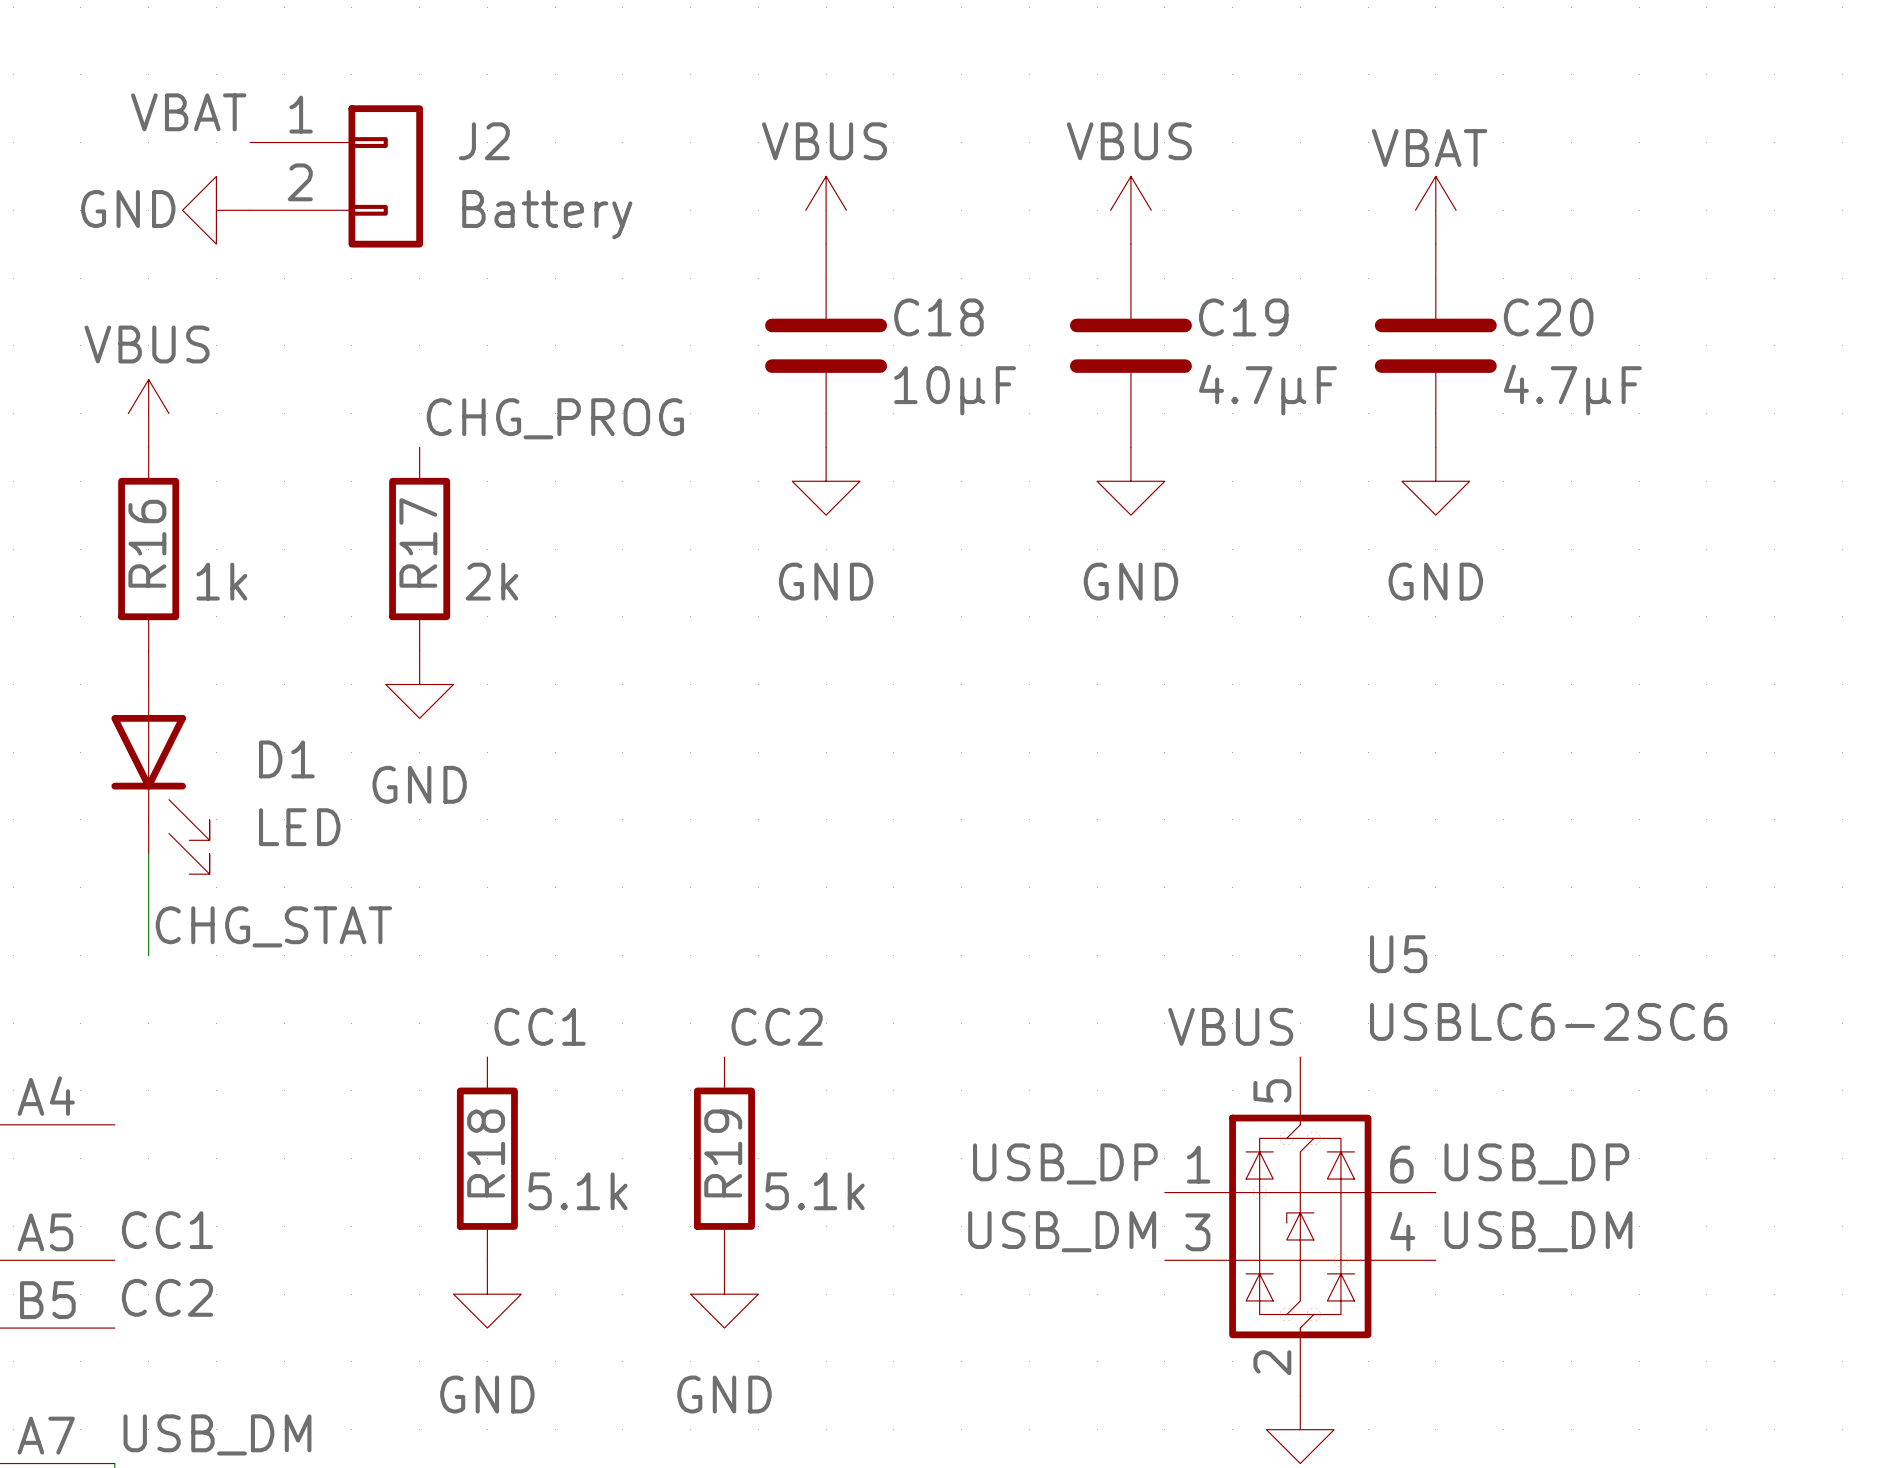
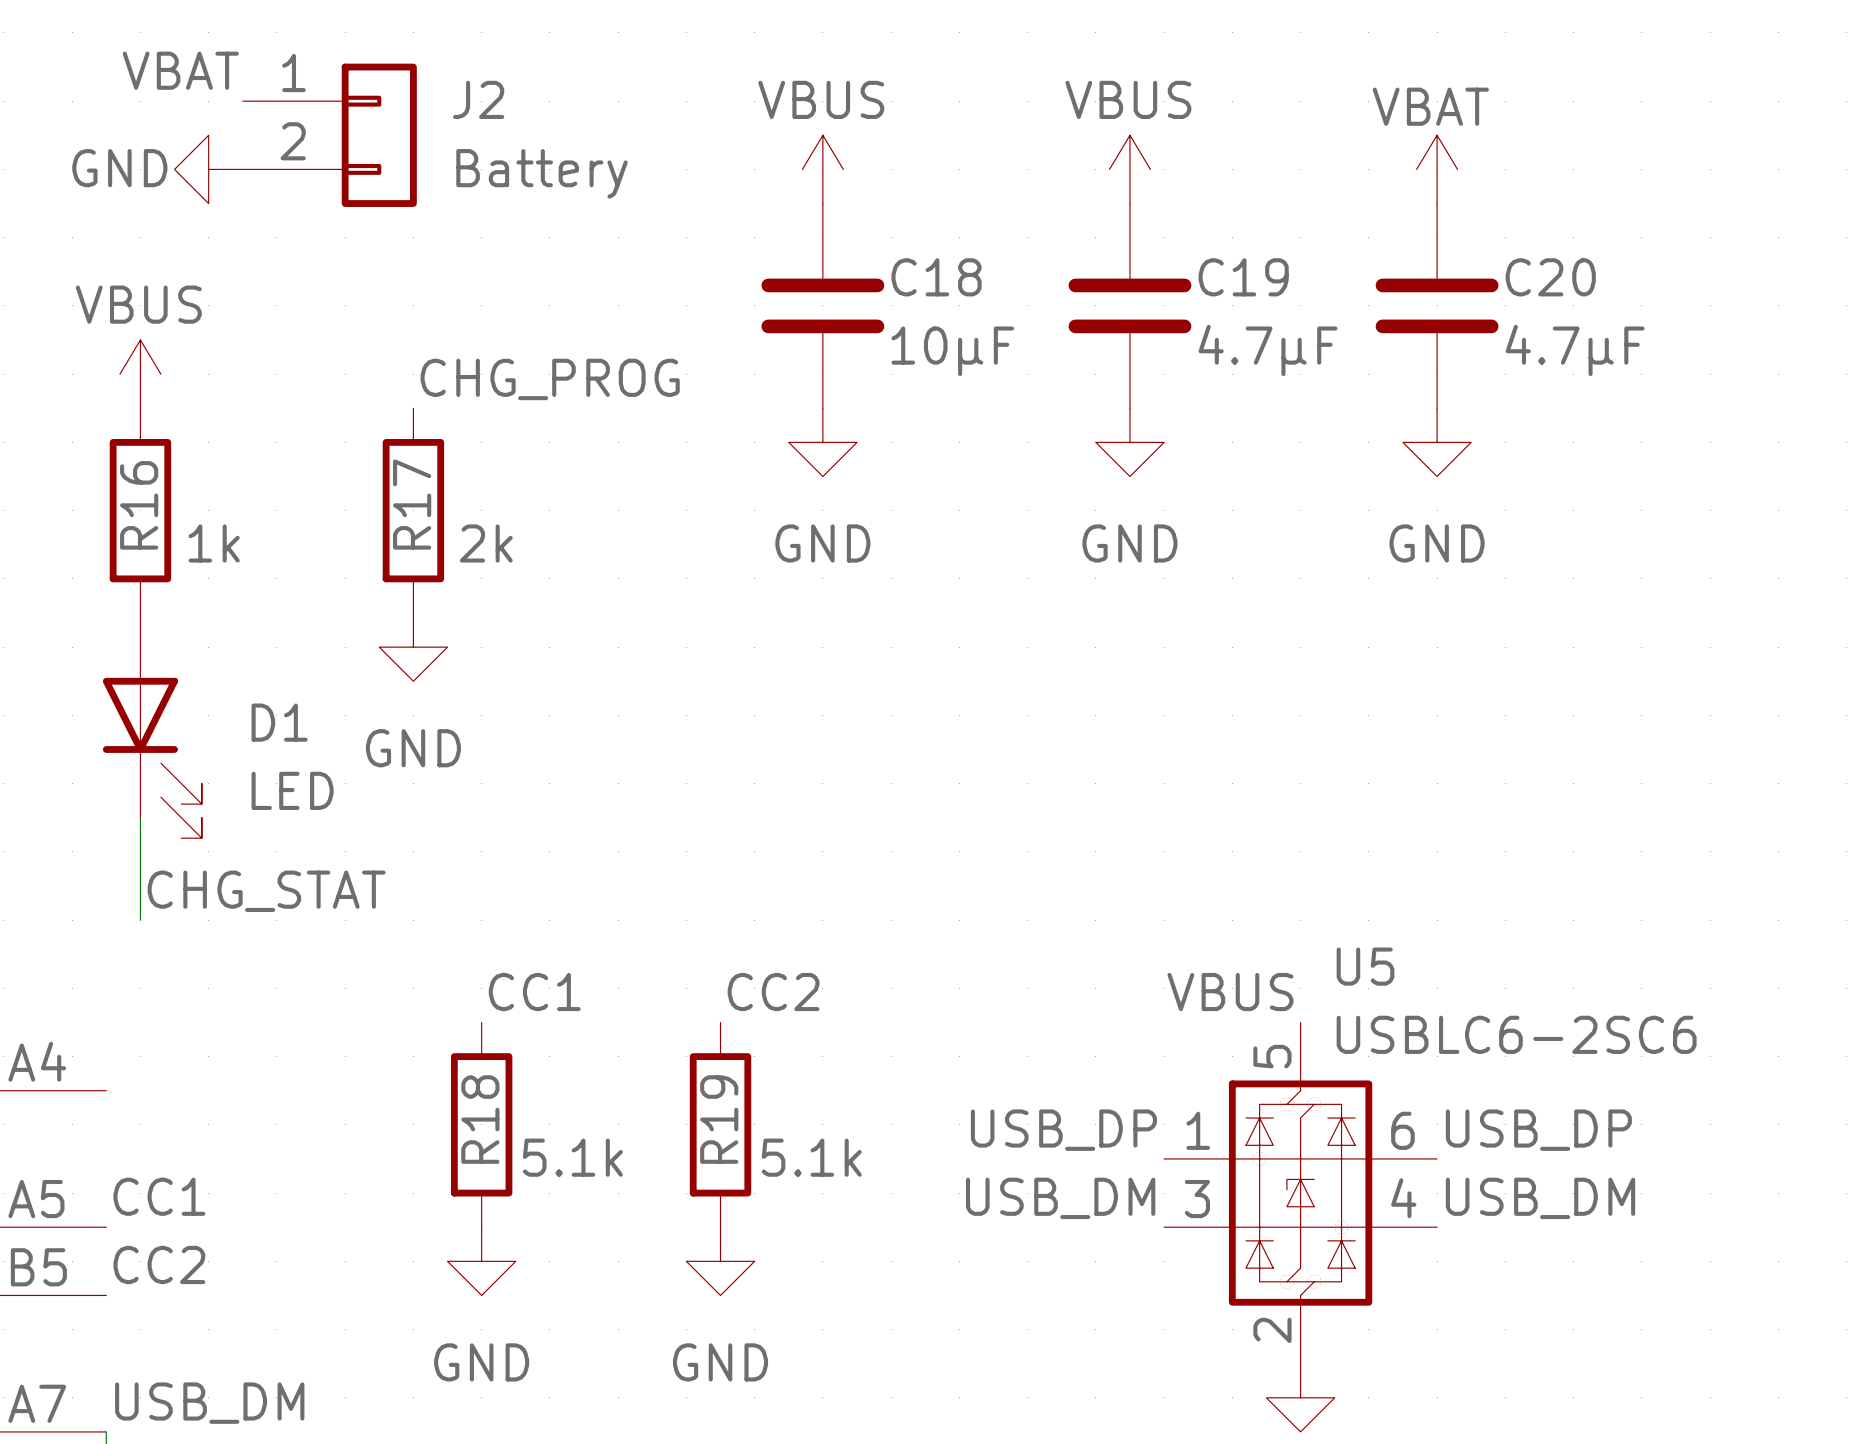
U5 name position: U5 (1398, 954) -> U5 (1365, 966)
U5 value position: USBLC6-2SC6 (1548, 1021) -> USBLC6-2SC6 (1516, 1034)

